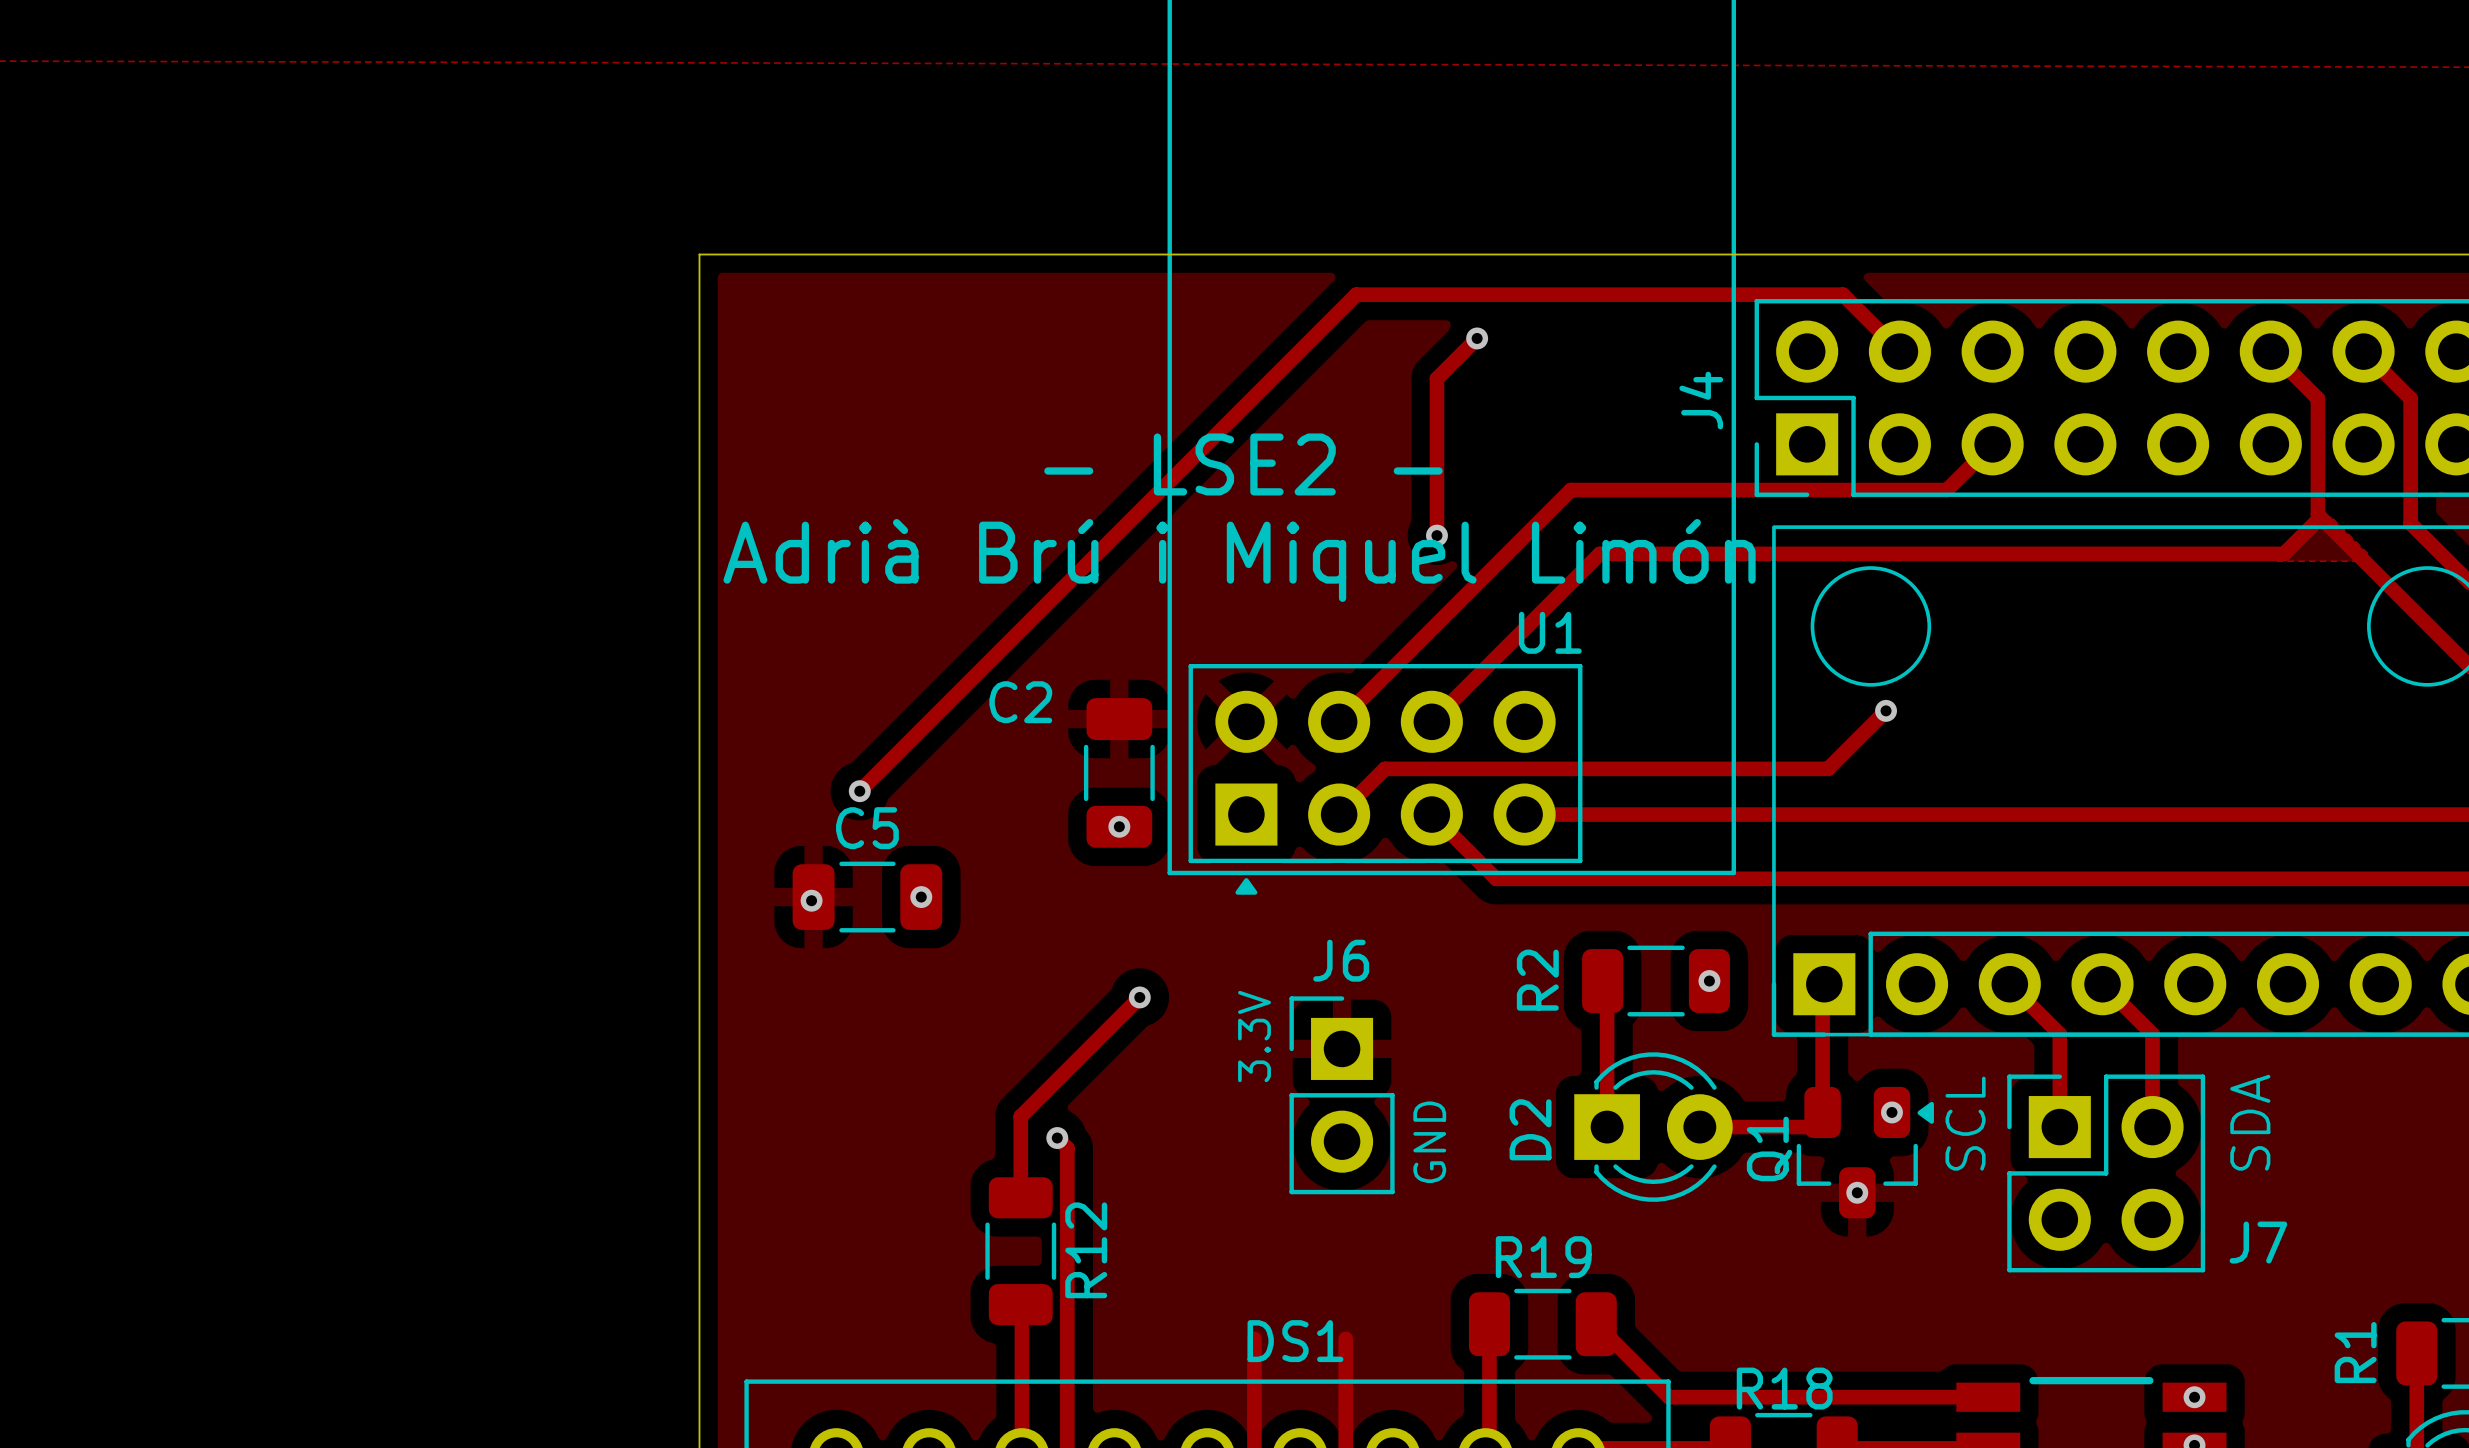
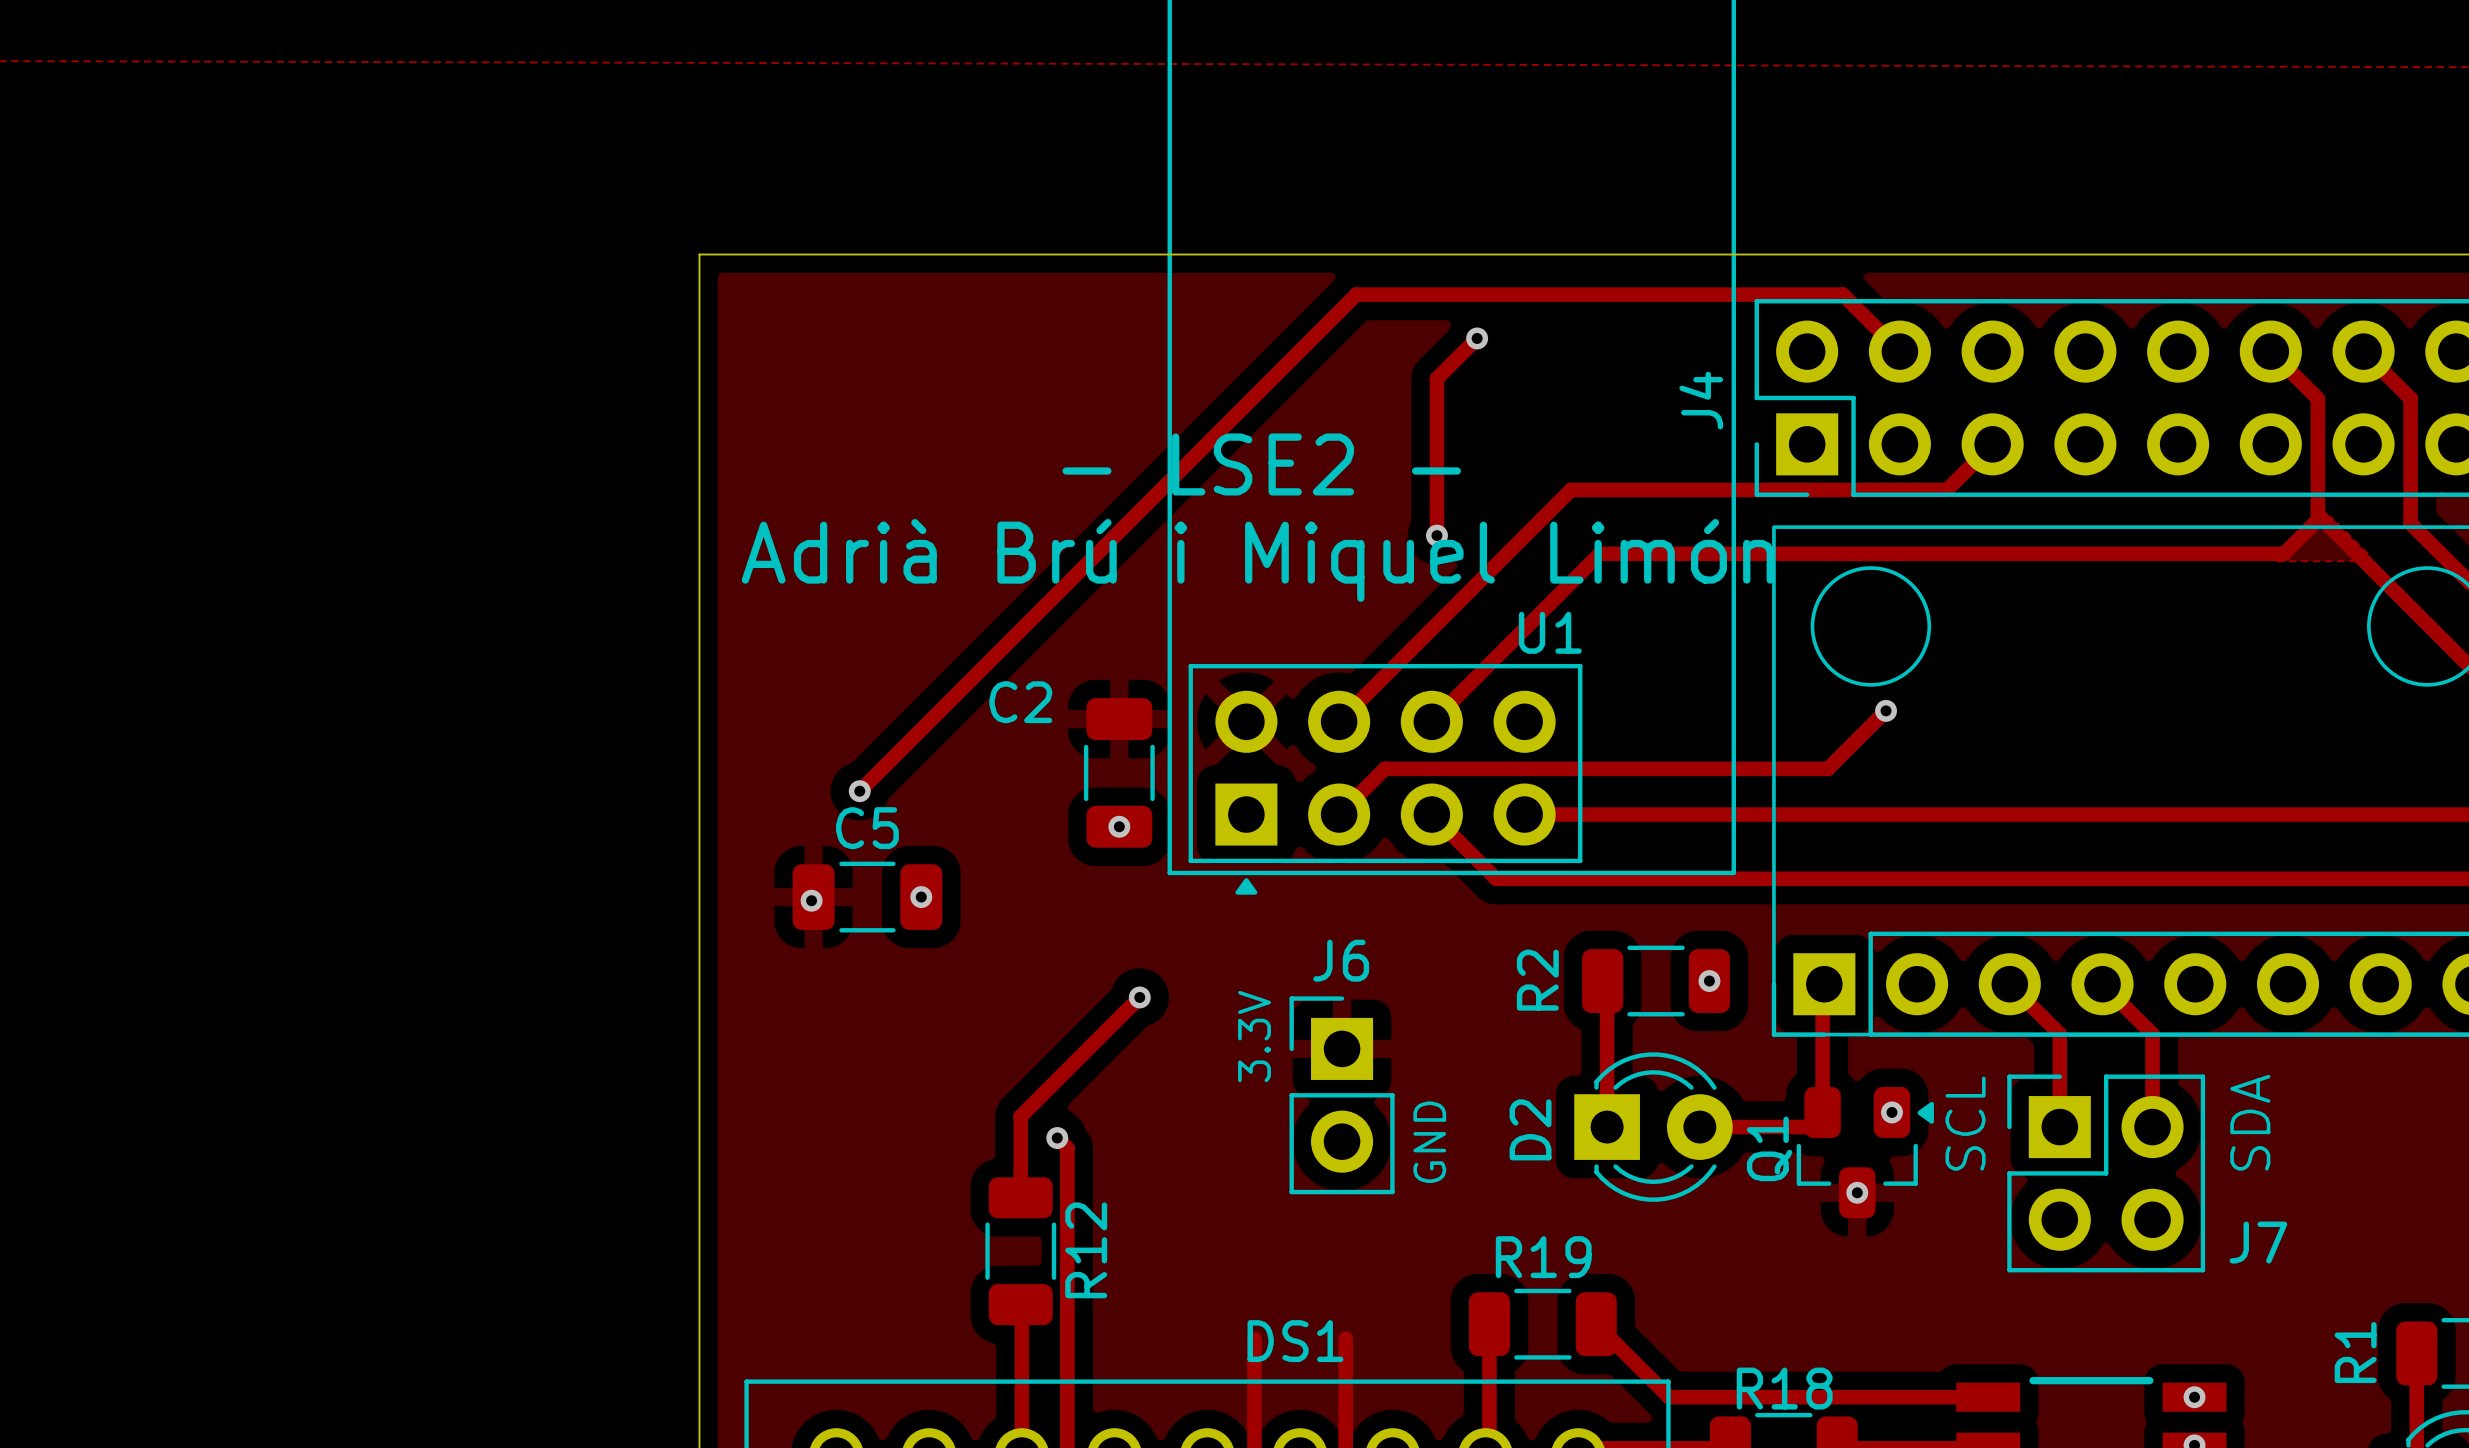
text position: - LSE2 - (1243, 464) -> - LSE2 - (1261, 464)
text position: Adrià Brú i Miquel Limón (1239, 560) -> Adrià Brú i Miquel Limón (1257, 560)

